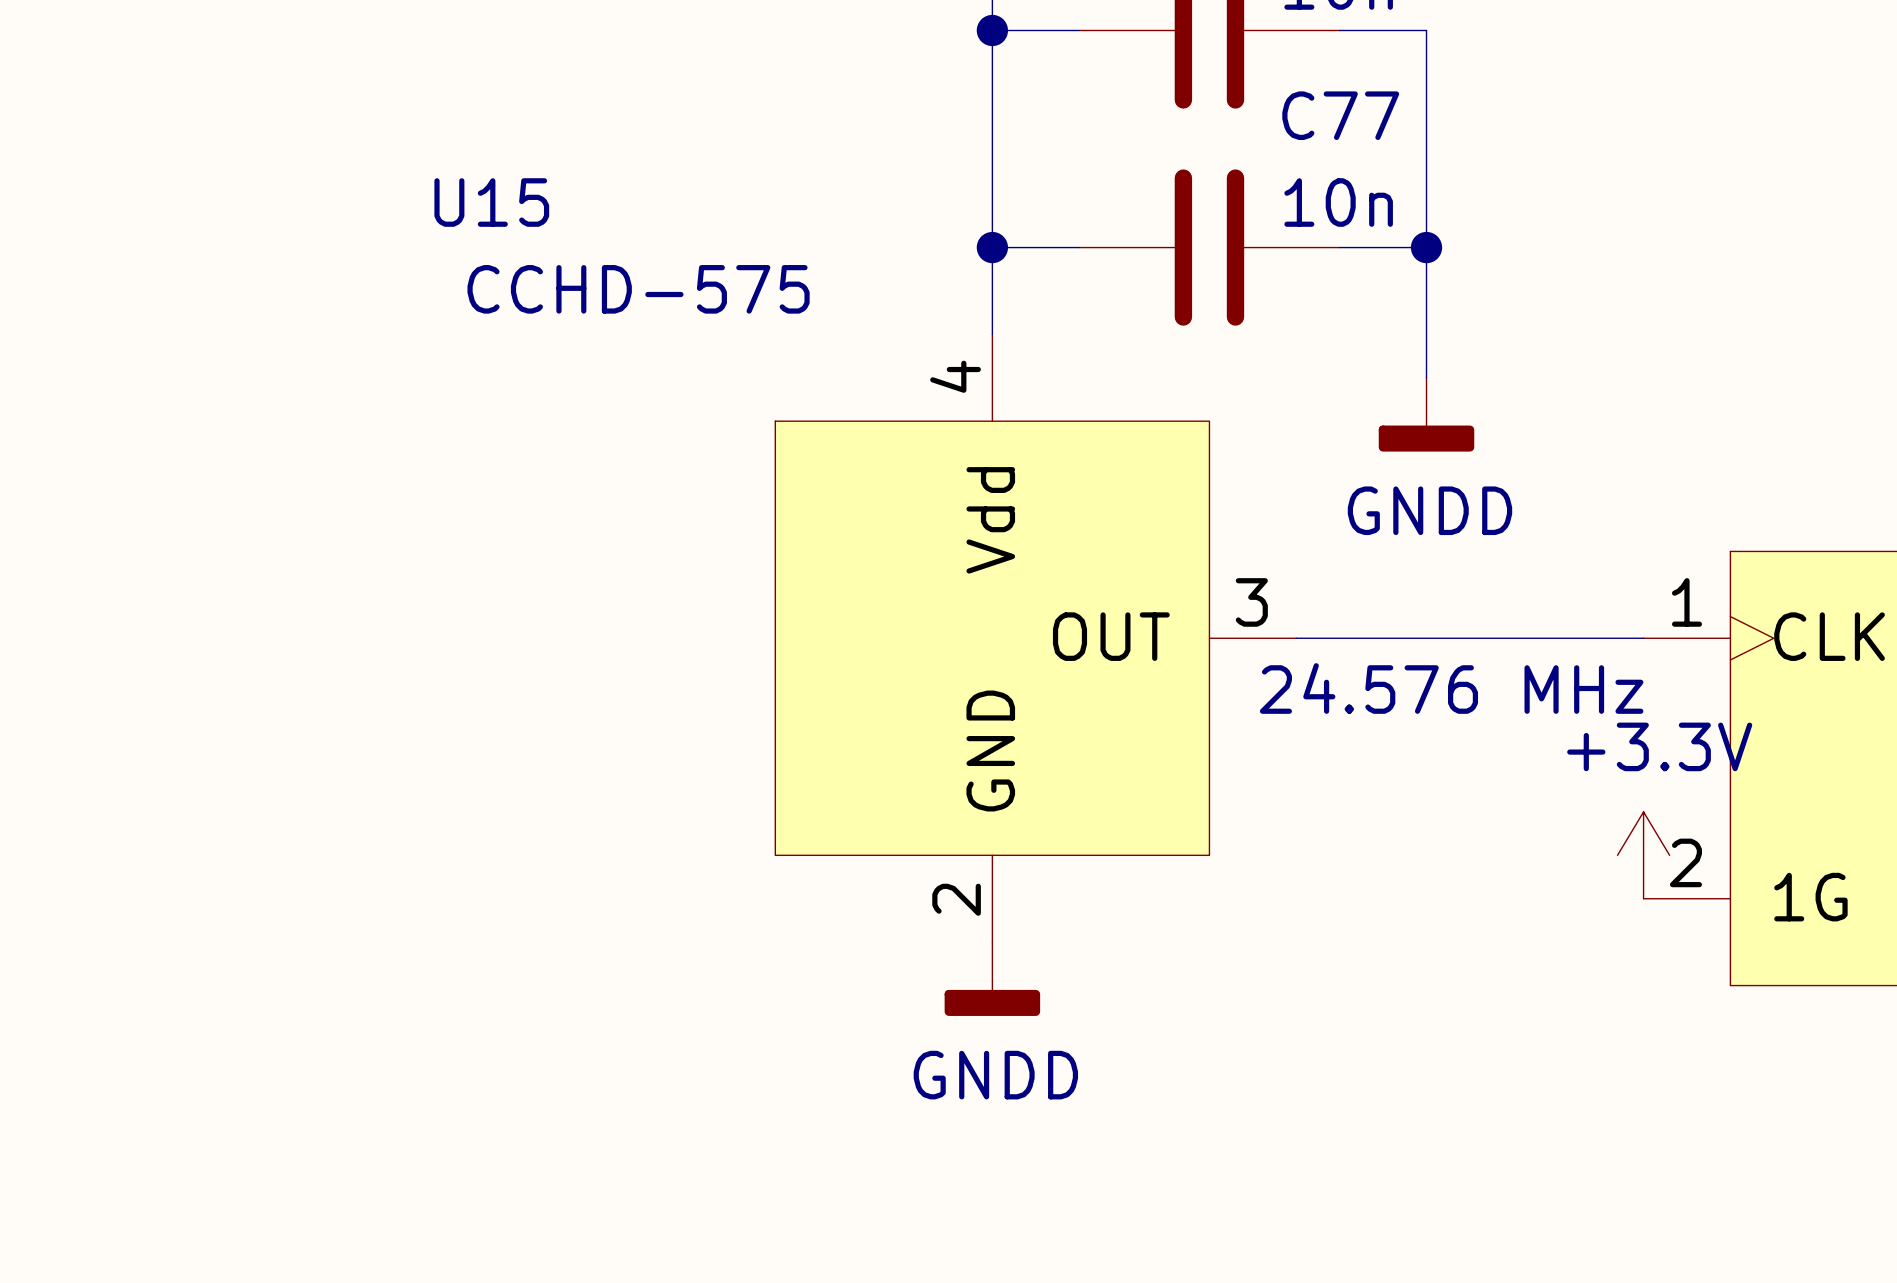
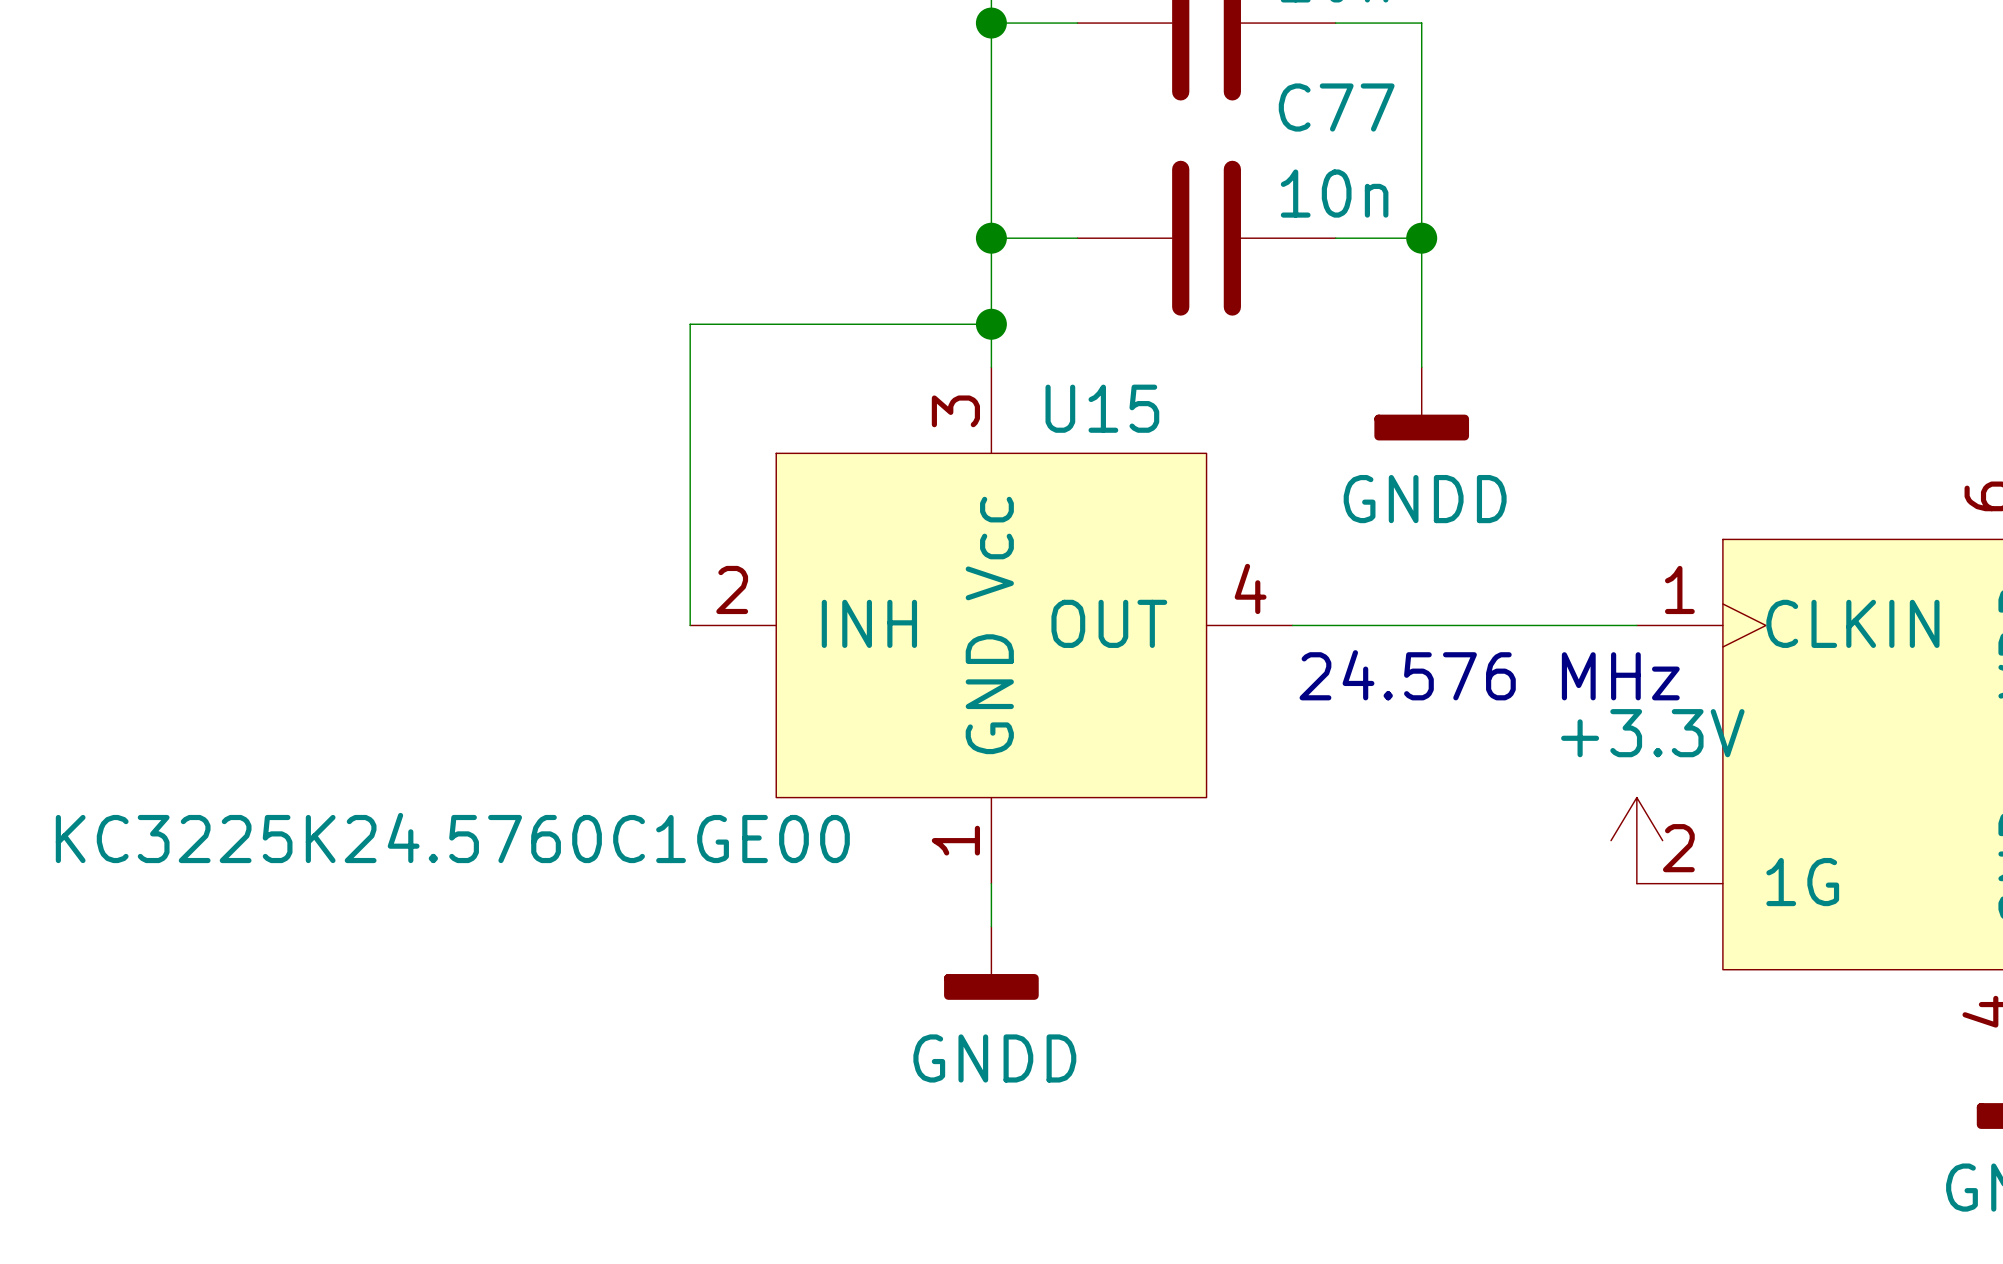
U15 name position: U15 (491, 202) -> U15 (1102, 408)
U15 value: CCHD-575 (638, 289) -> KC3225K24.5760C1GE00 (452, 837)
U15 symbol: [775, 334, 1297, 943] -> [690, 367, 1293, 884]
junction: none -> (991, 324)
wire: none -> (991, 367) (991, 324) (690, 324) (690, 625)
text position: 24.576 MHz (1451, 688) -> 24.576 MHz (1489, 675)

